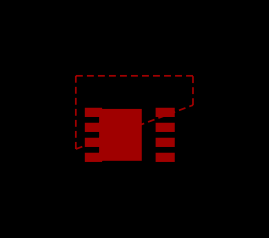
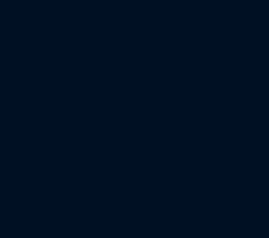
top zone outline: (192, 75) (75, 75) (75, 149) (192, 105) (192, 75) -> none
part: (129, 134) -> none

